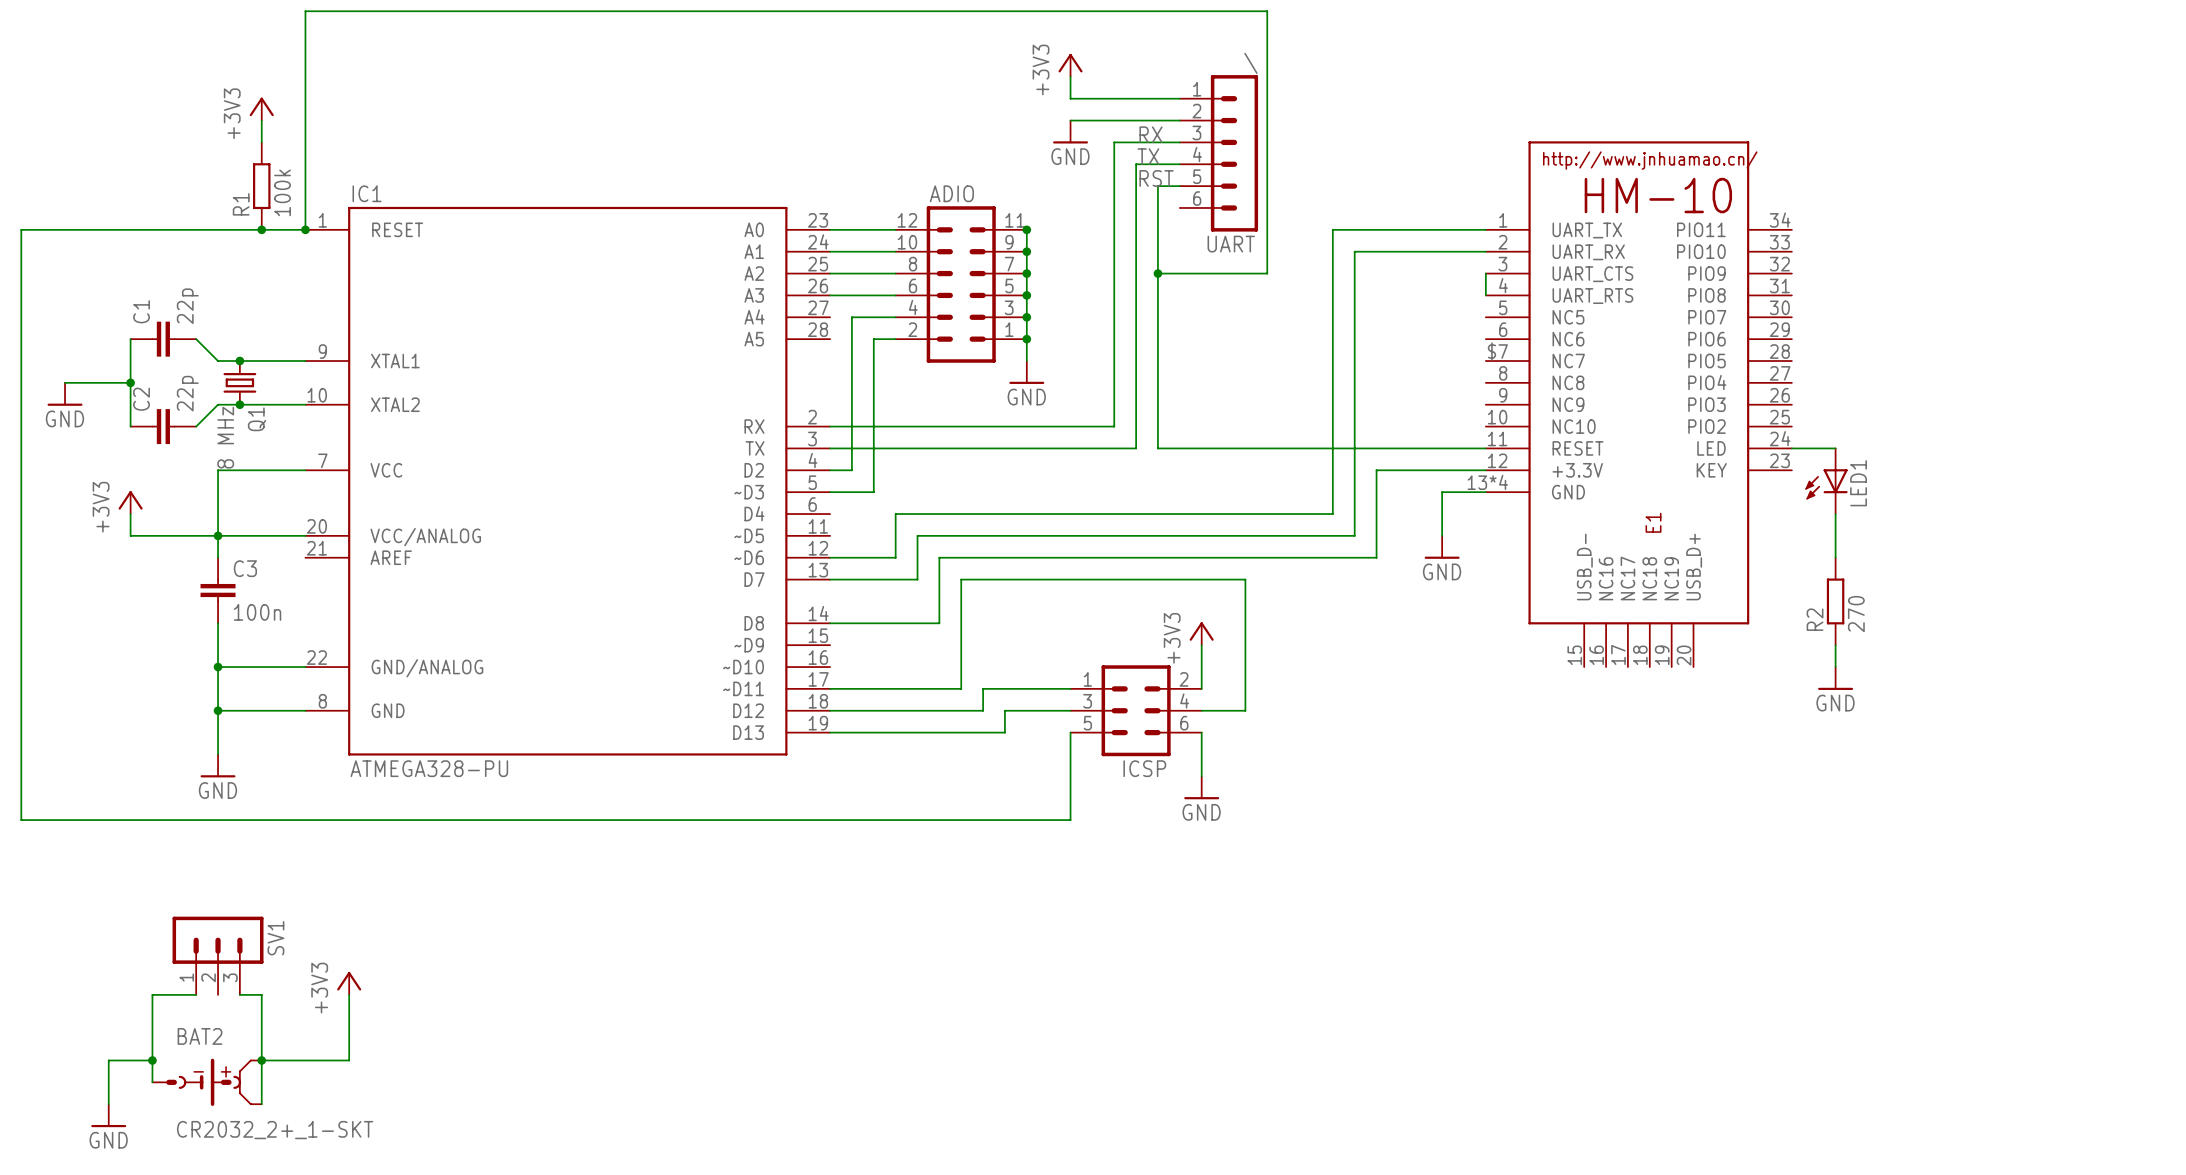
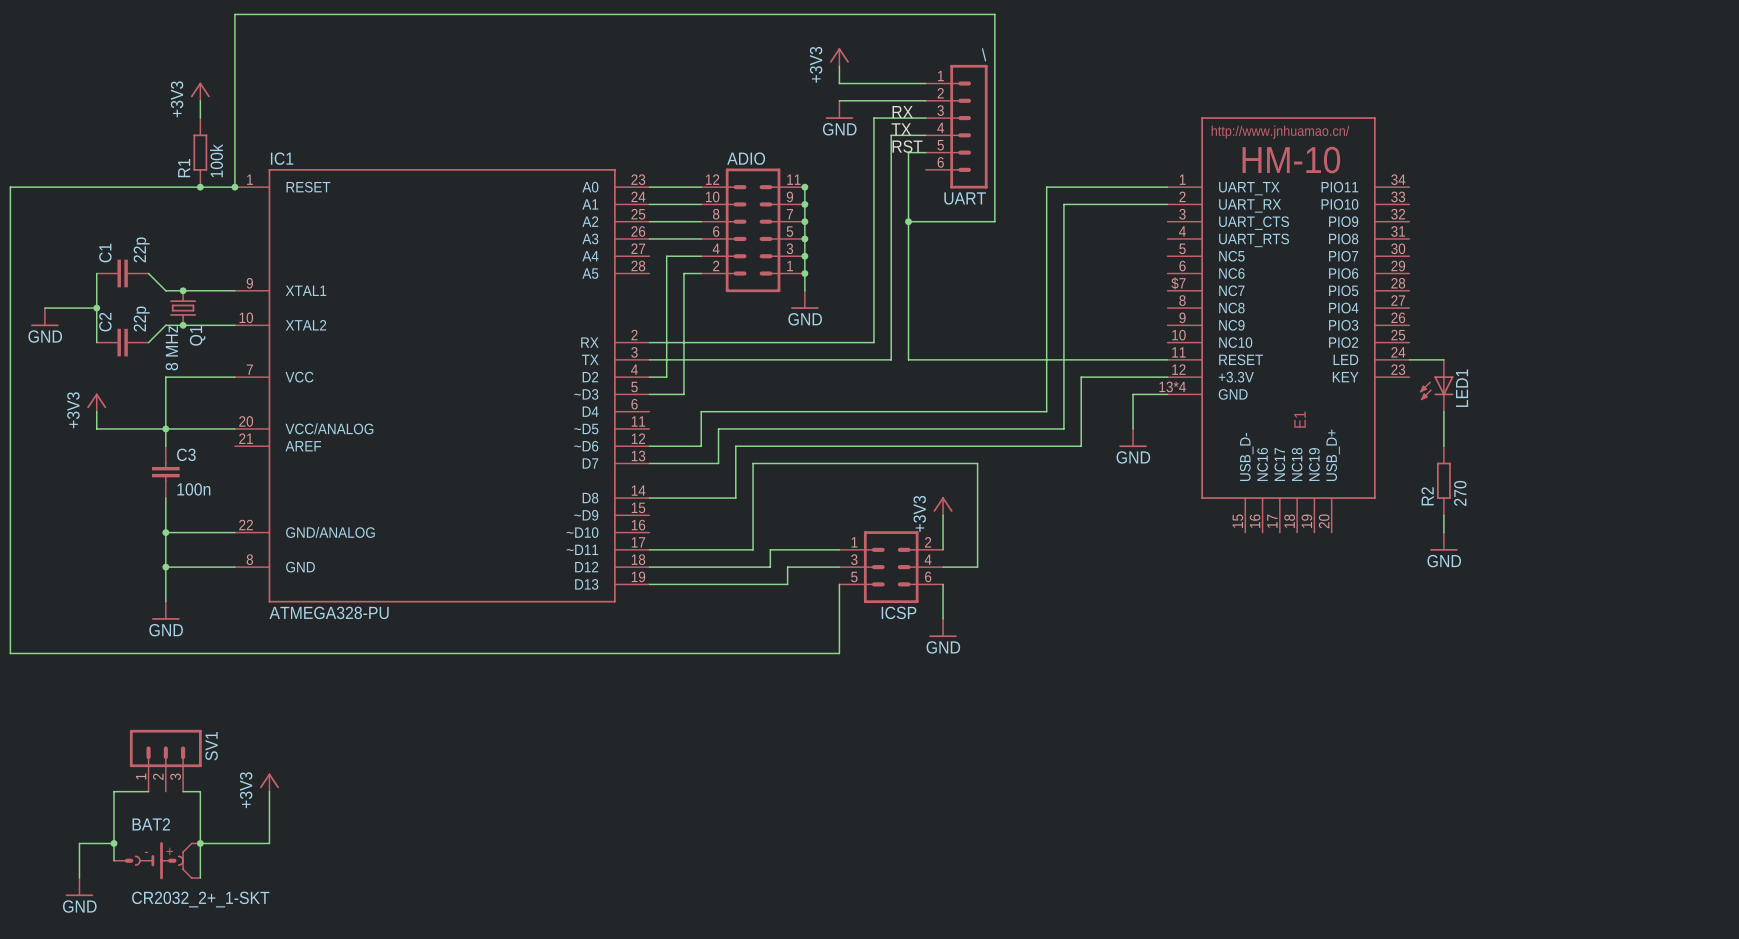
wire: (1485, 273) (1485, 295) -> none

